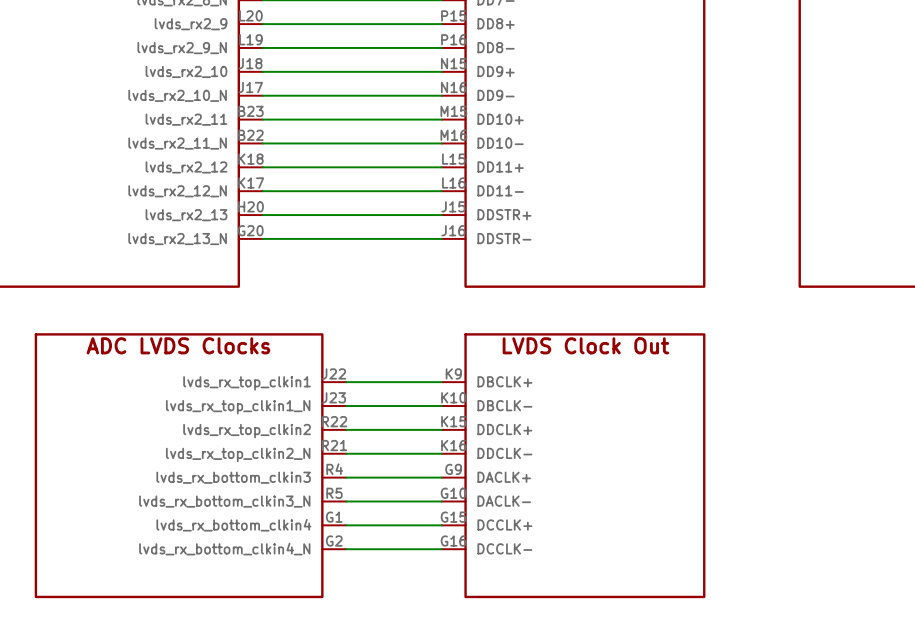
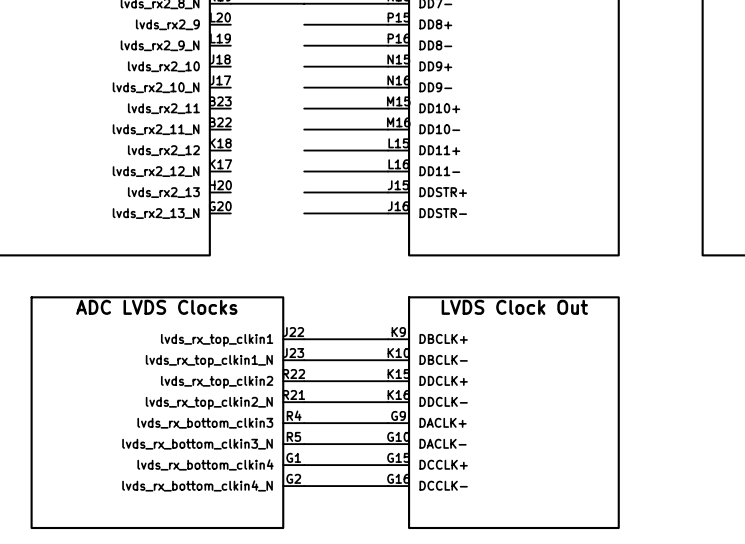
wire: (262, 24) (346, 24) -> none
wire: (262, 47) (346, 47) -> none
wire: (262, 71) (346, 71) -> none
wire: (262, 95) (346, 95) -> none
wire: (262, 119) (346, 119) -> none
wire: (262, 143) (346, 143) -> none
wire: (262, 167) (346, 167) -> none
wire: (262, 191) (346, 191) -> none
wire: (262, 215) (346, 215) -> none
wire: (262, 238) (346, 238) -> none

